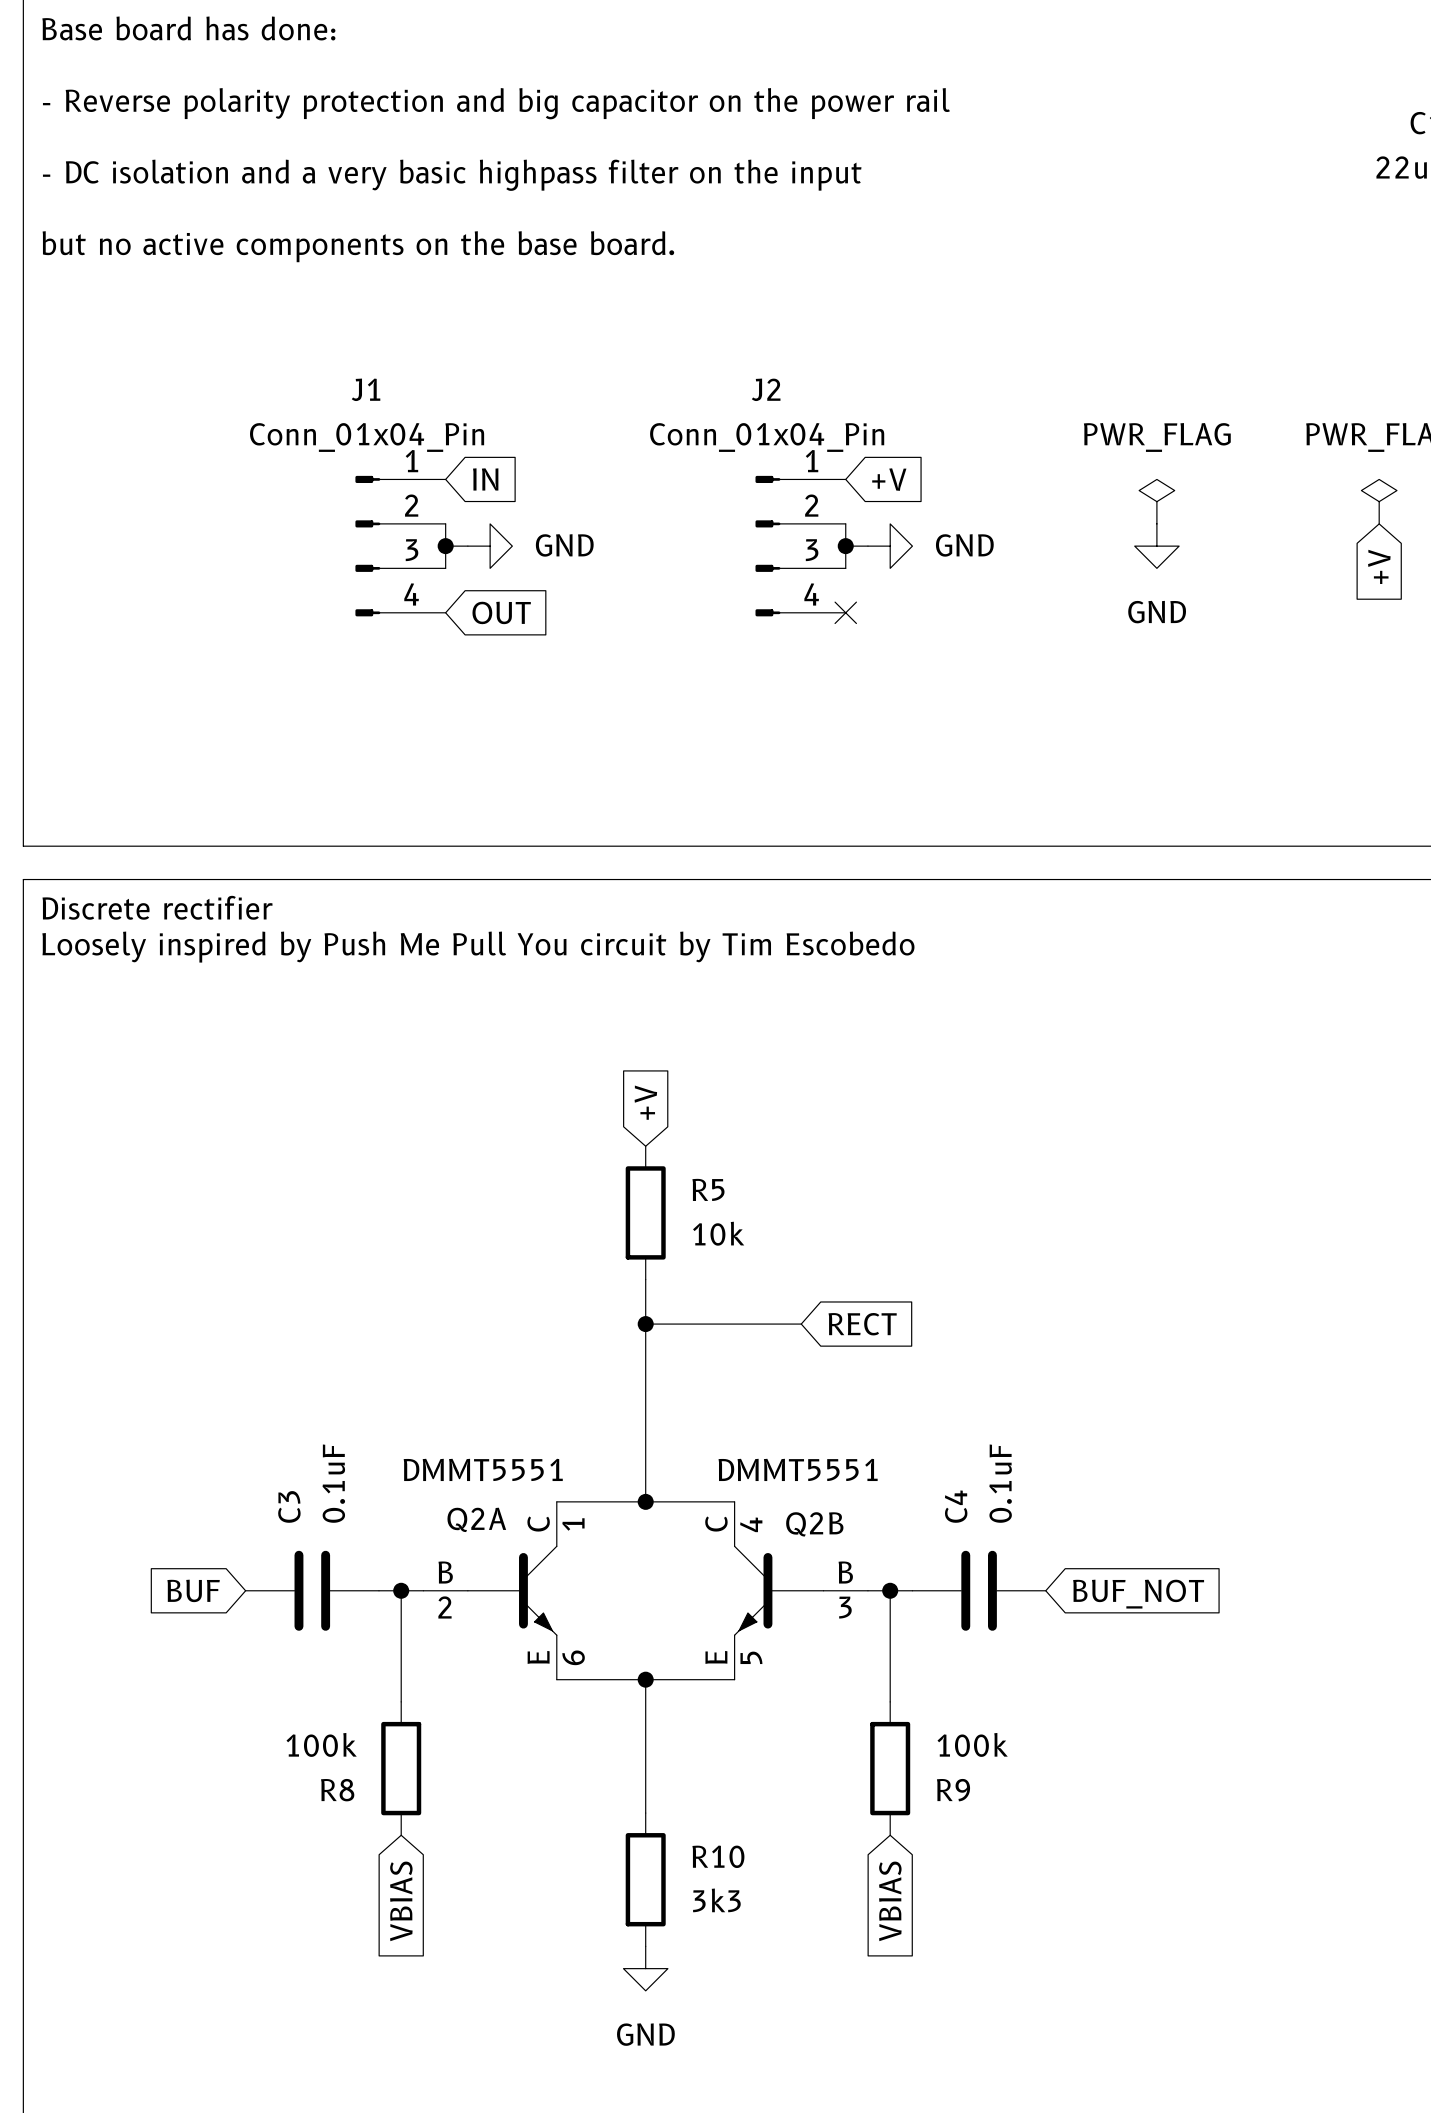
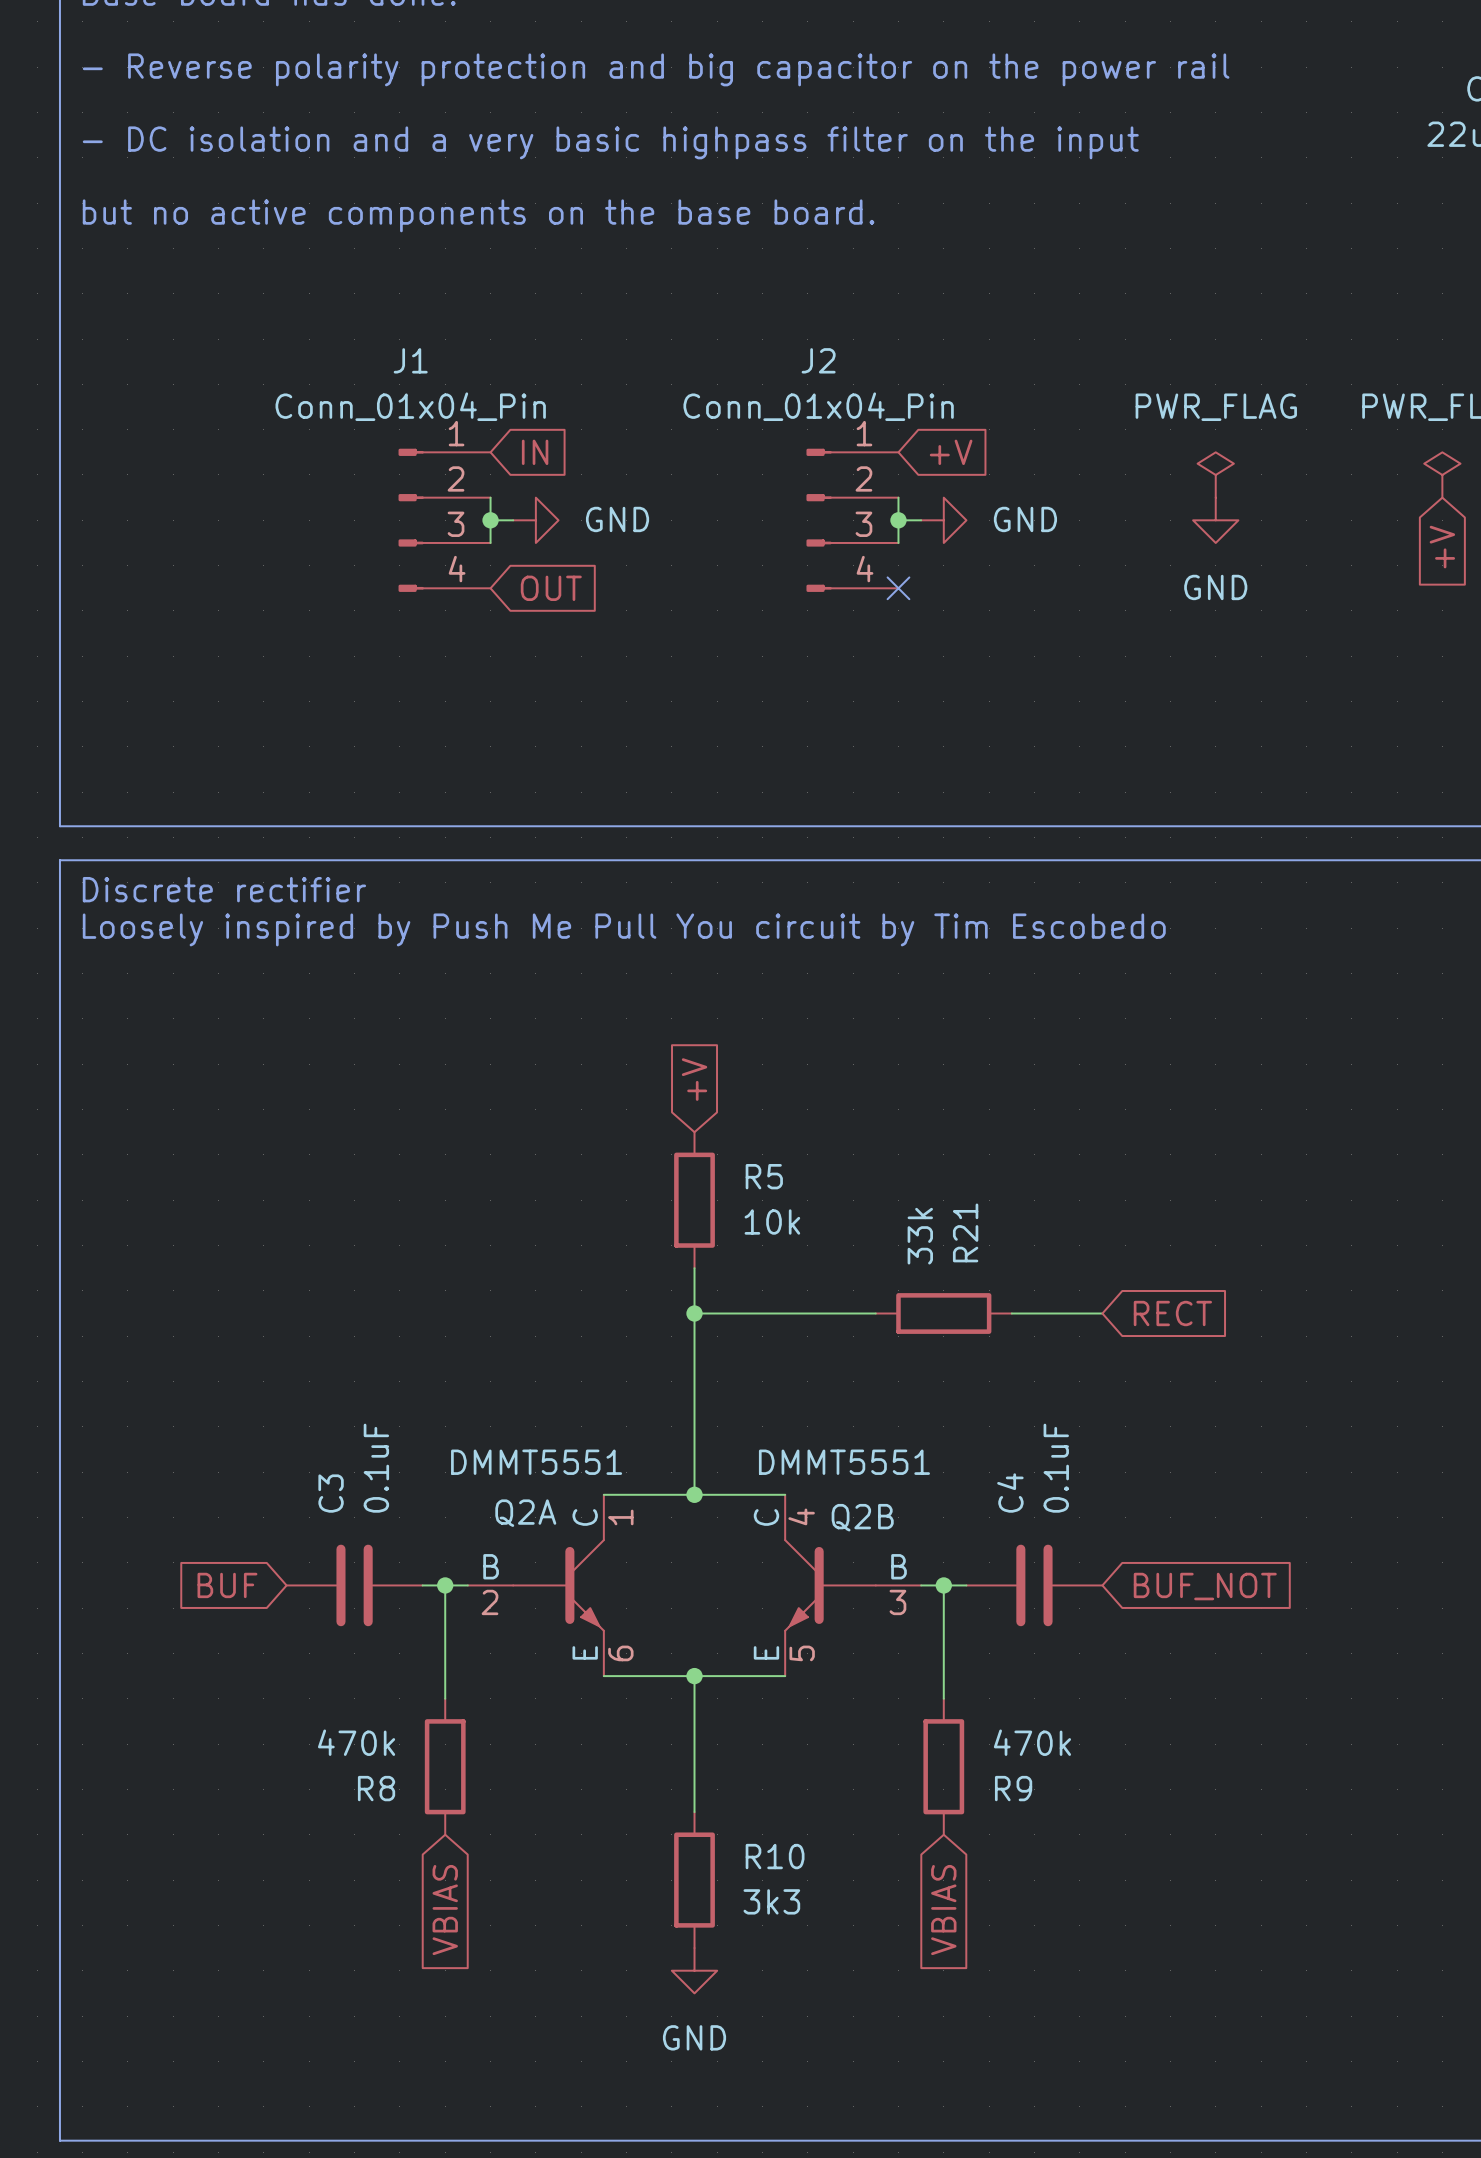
wire: none -> (853, 1313) (875, 1313)
global label position: RECT (862, 1324) -> RECT (1172, 1313)
R21: none -> 33k (943, 1313)
wire: none -> (1011, 1313) (1102, 1313)
R8 value: 100k (321, 1744) -> 470k (356, 1742)
R9 value: 100k (972, 1744) -> 470k (1032, 1742)

